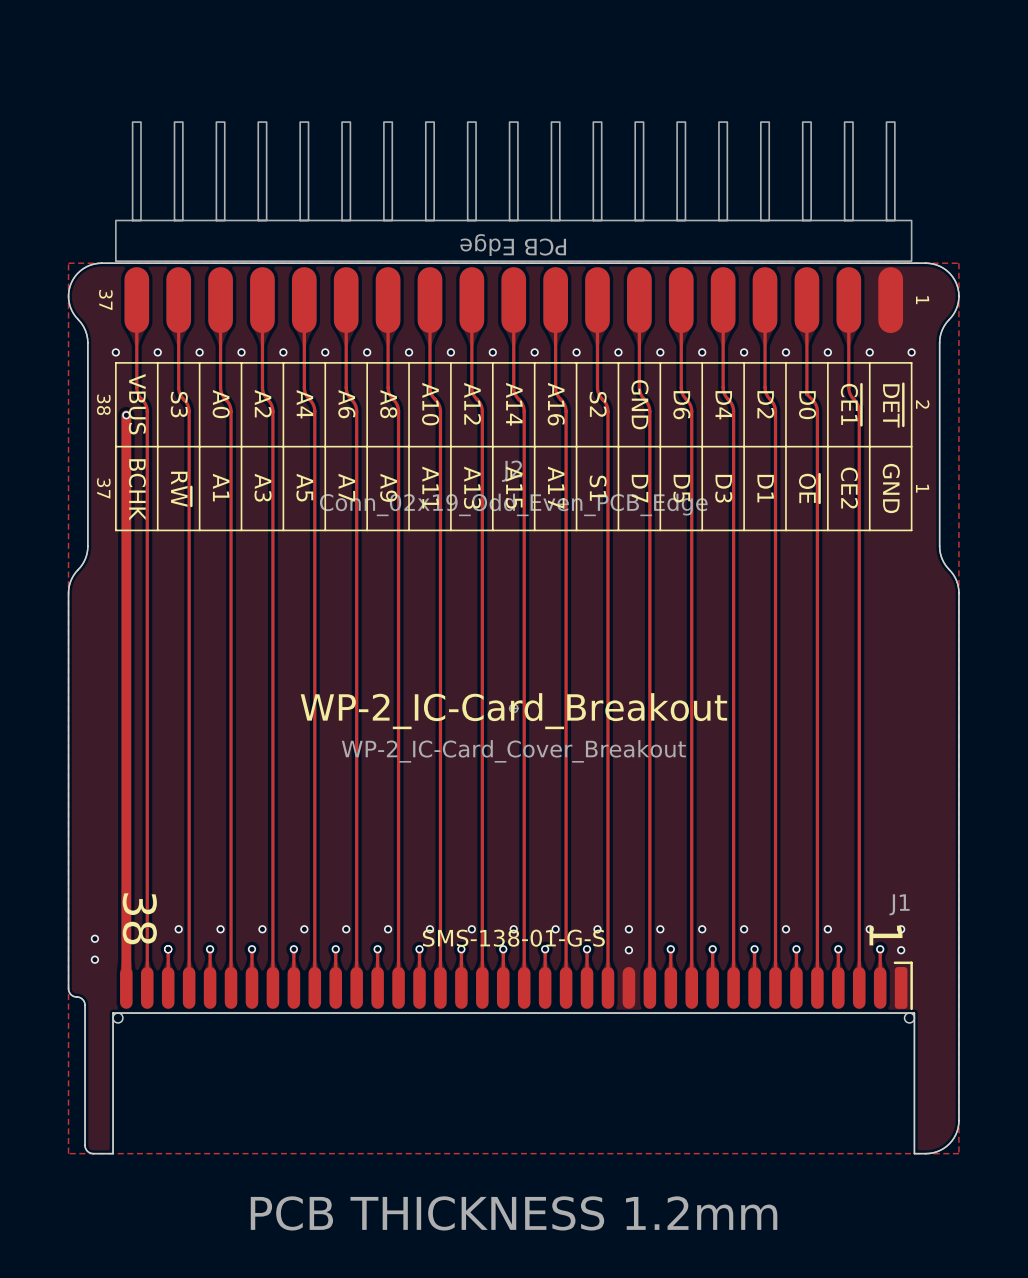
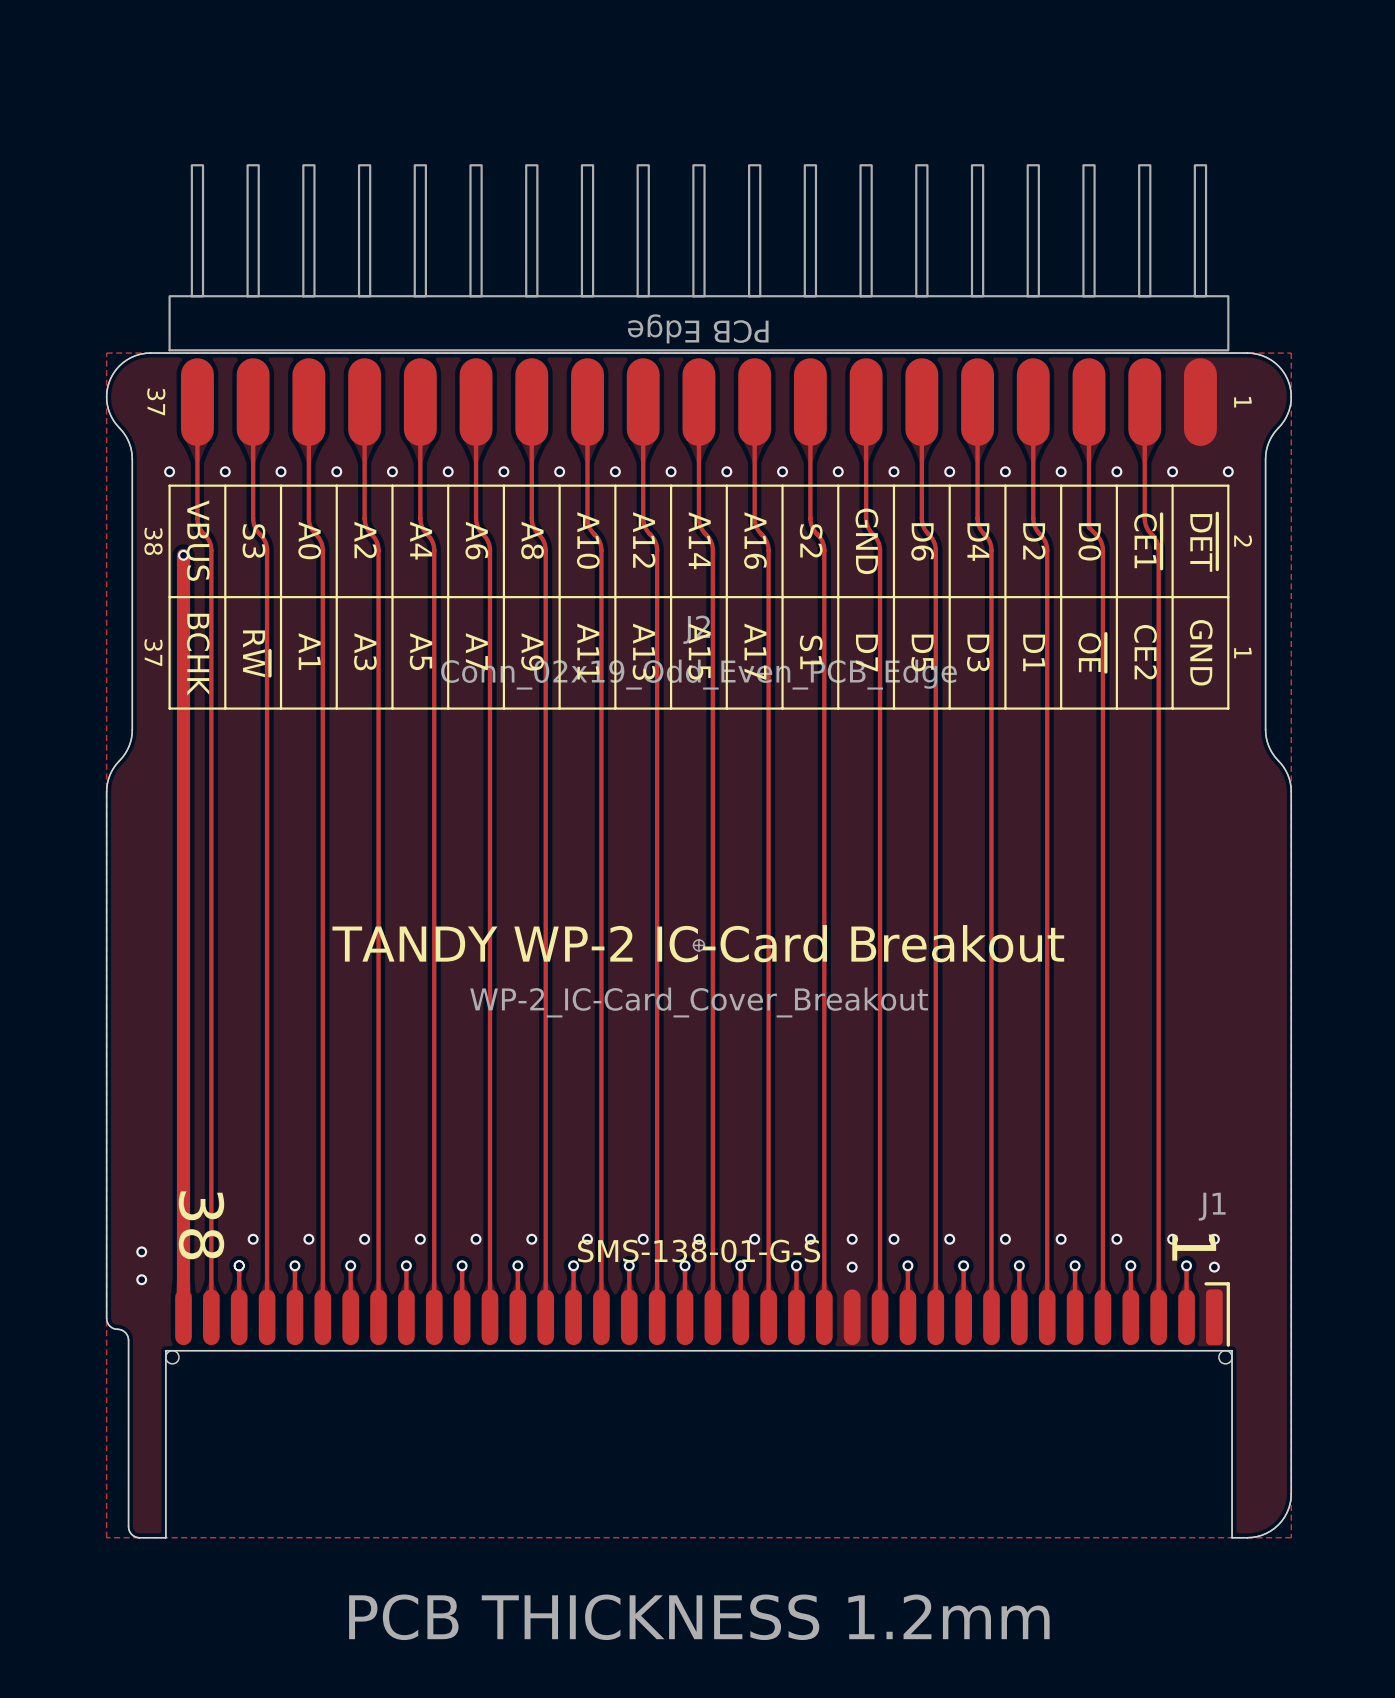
text: WP-2_IC-Card_Breakout (513, 711) -> TANDY WP-2 IC-Card Breakout (698, 943)

